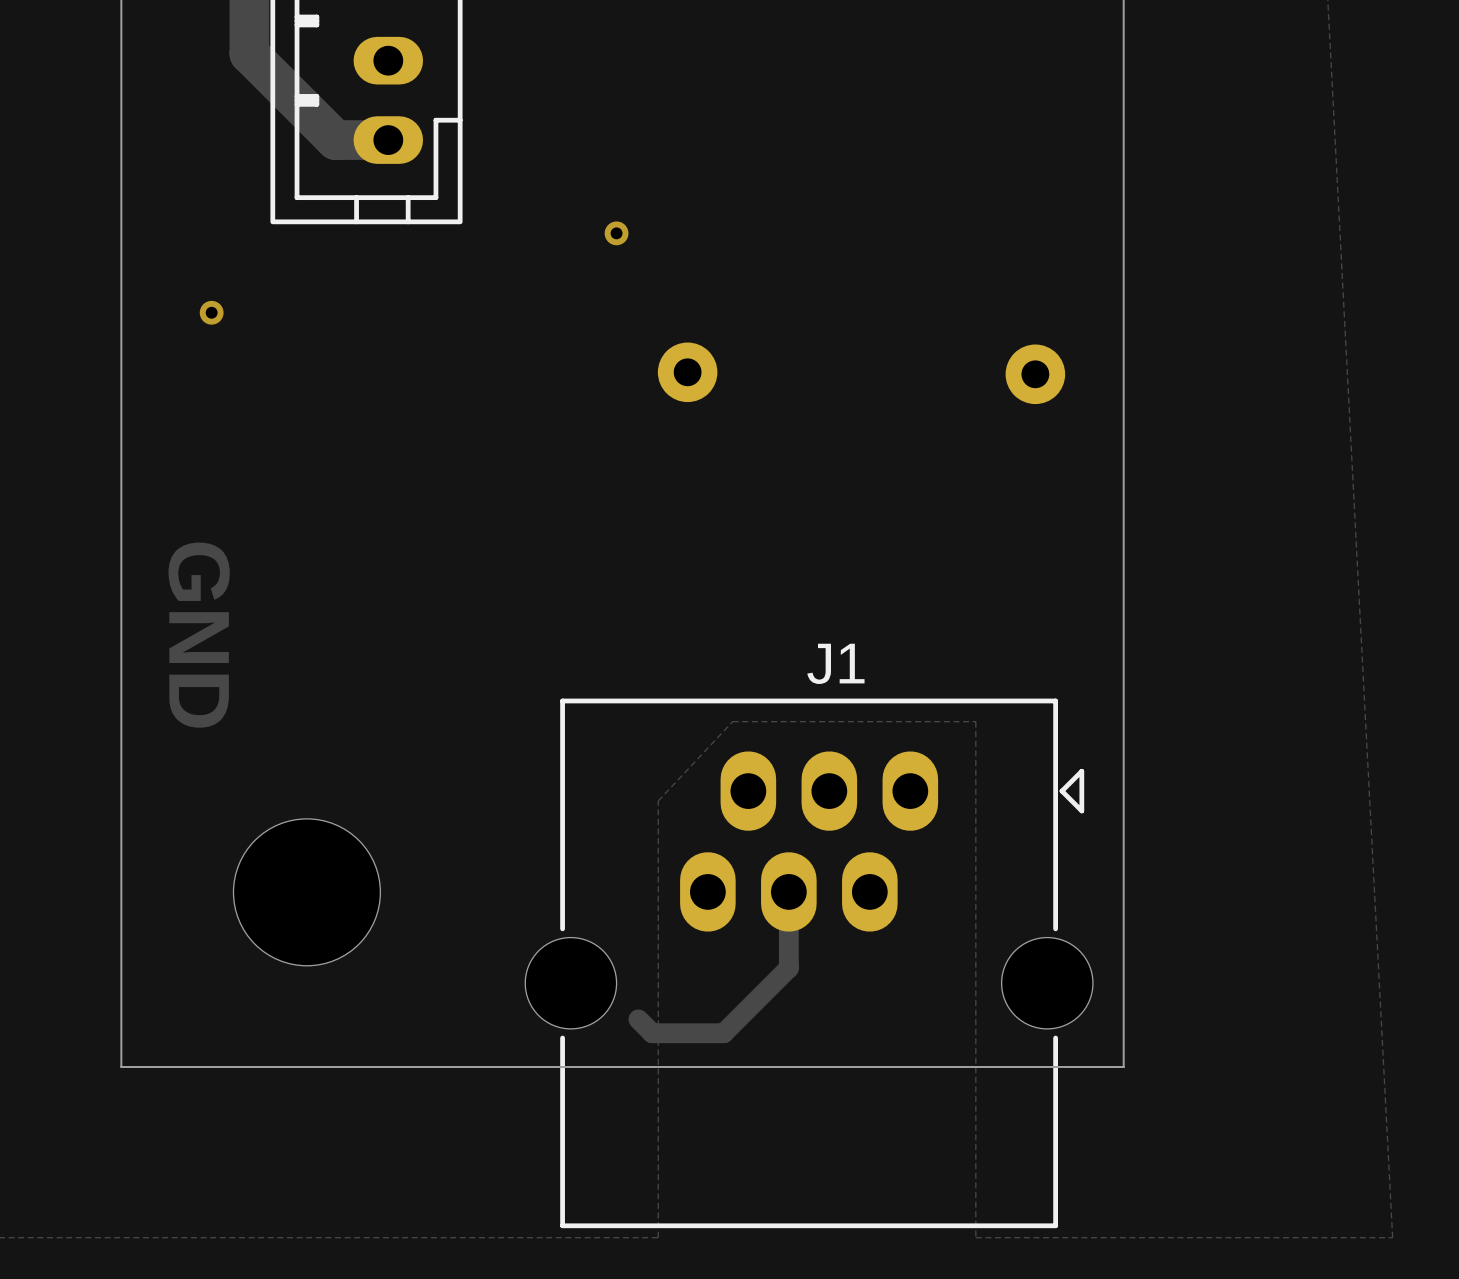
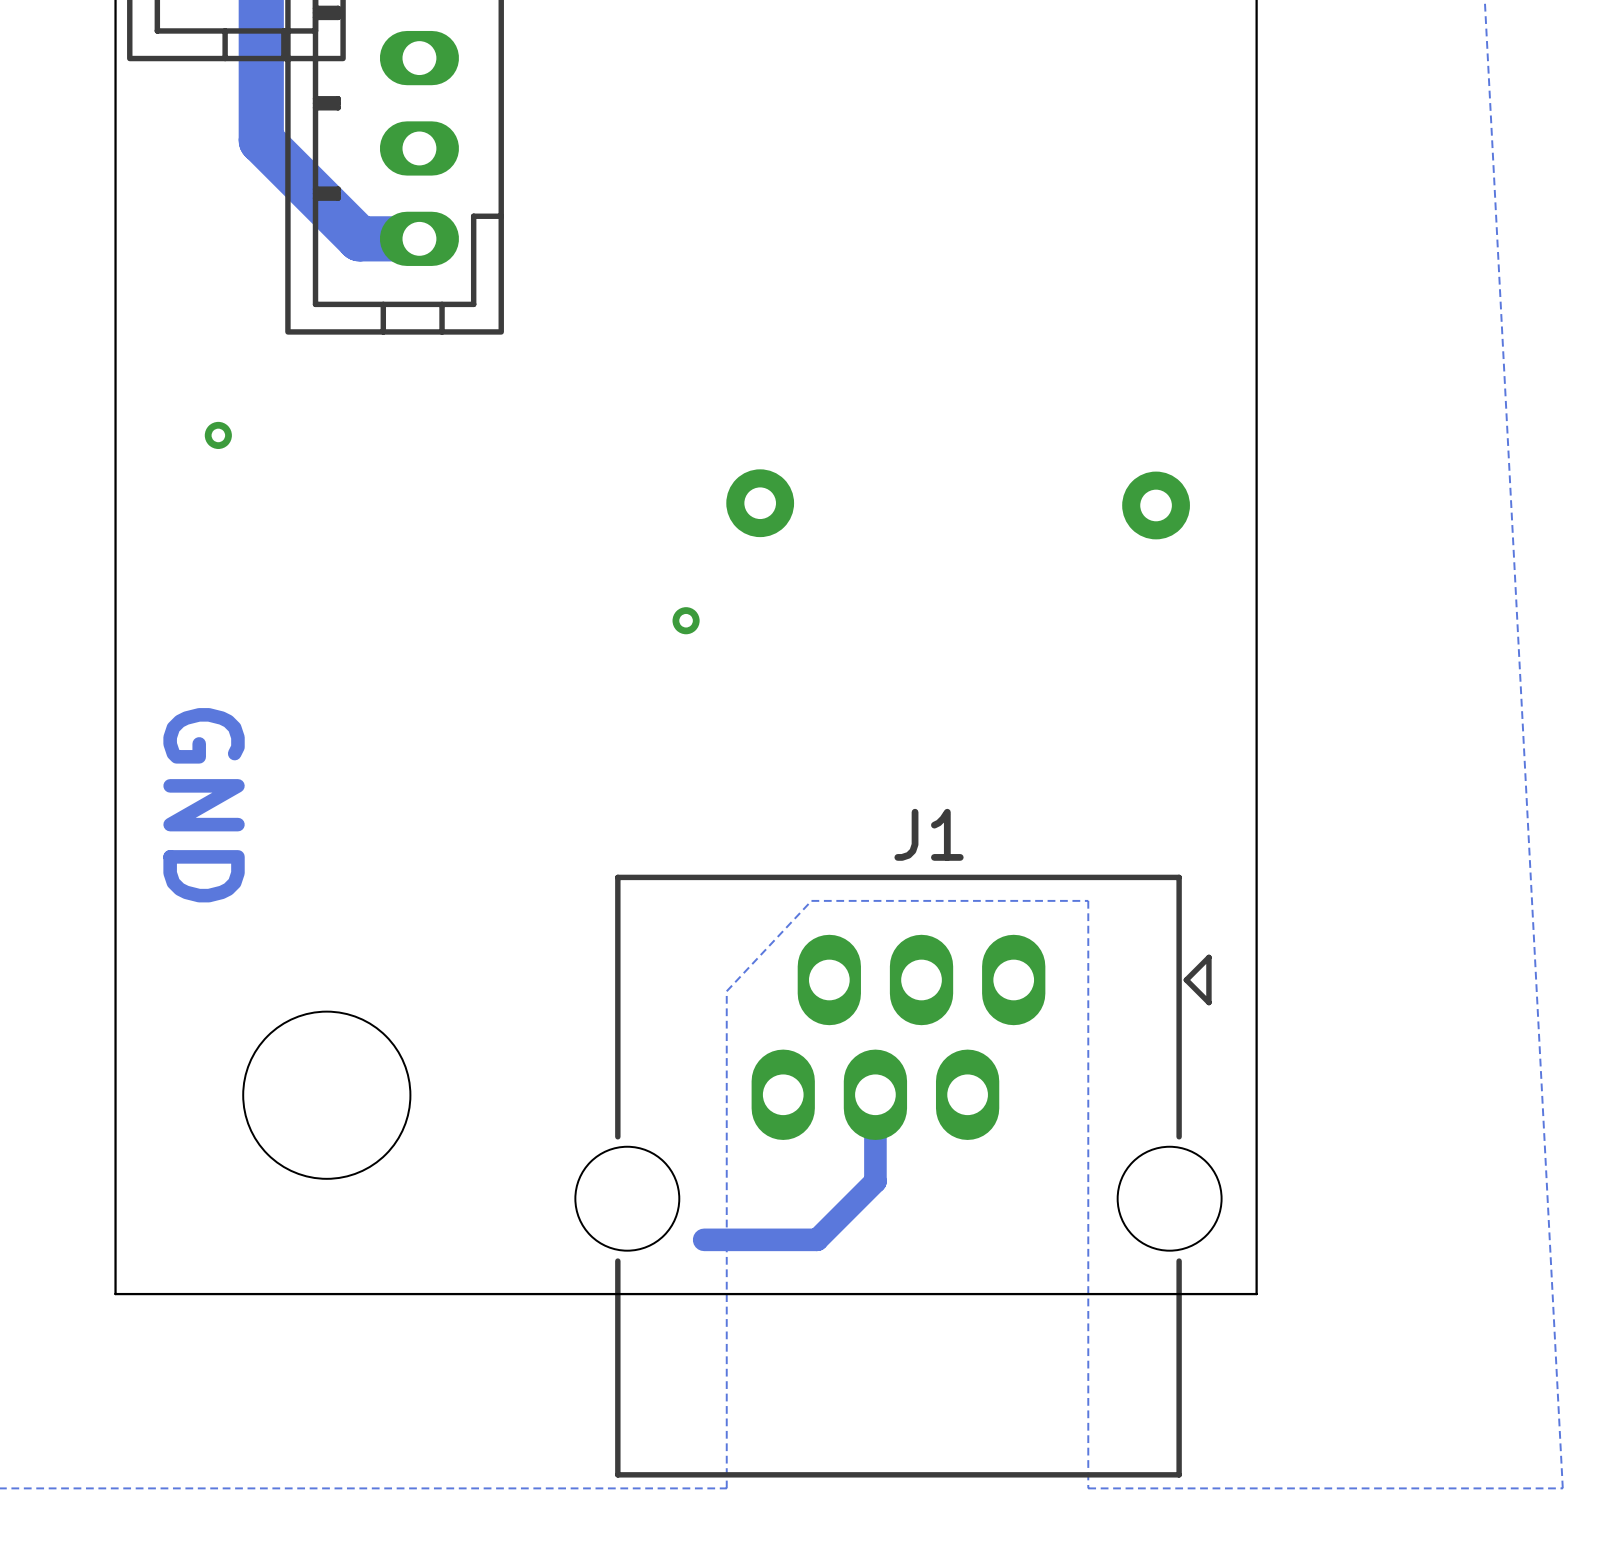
via: (616, 233) -> none
via: none -> (686, 620)
track: (737, 1019) (723, 1033) (652, 1033) (638, 1019) -> (817, 1239) (704, 1239)

